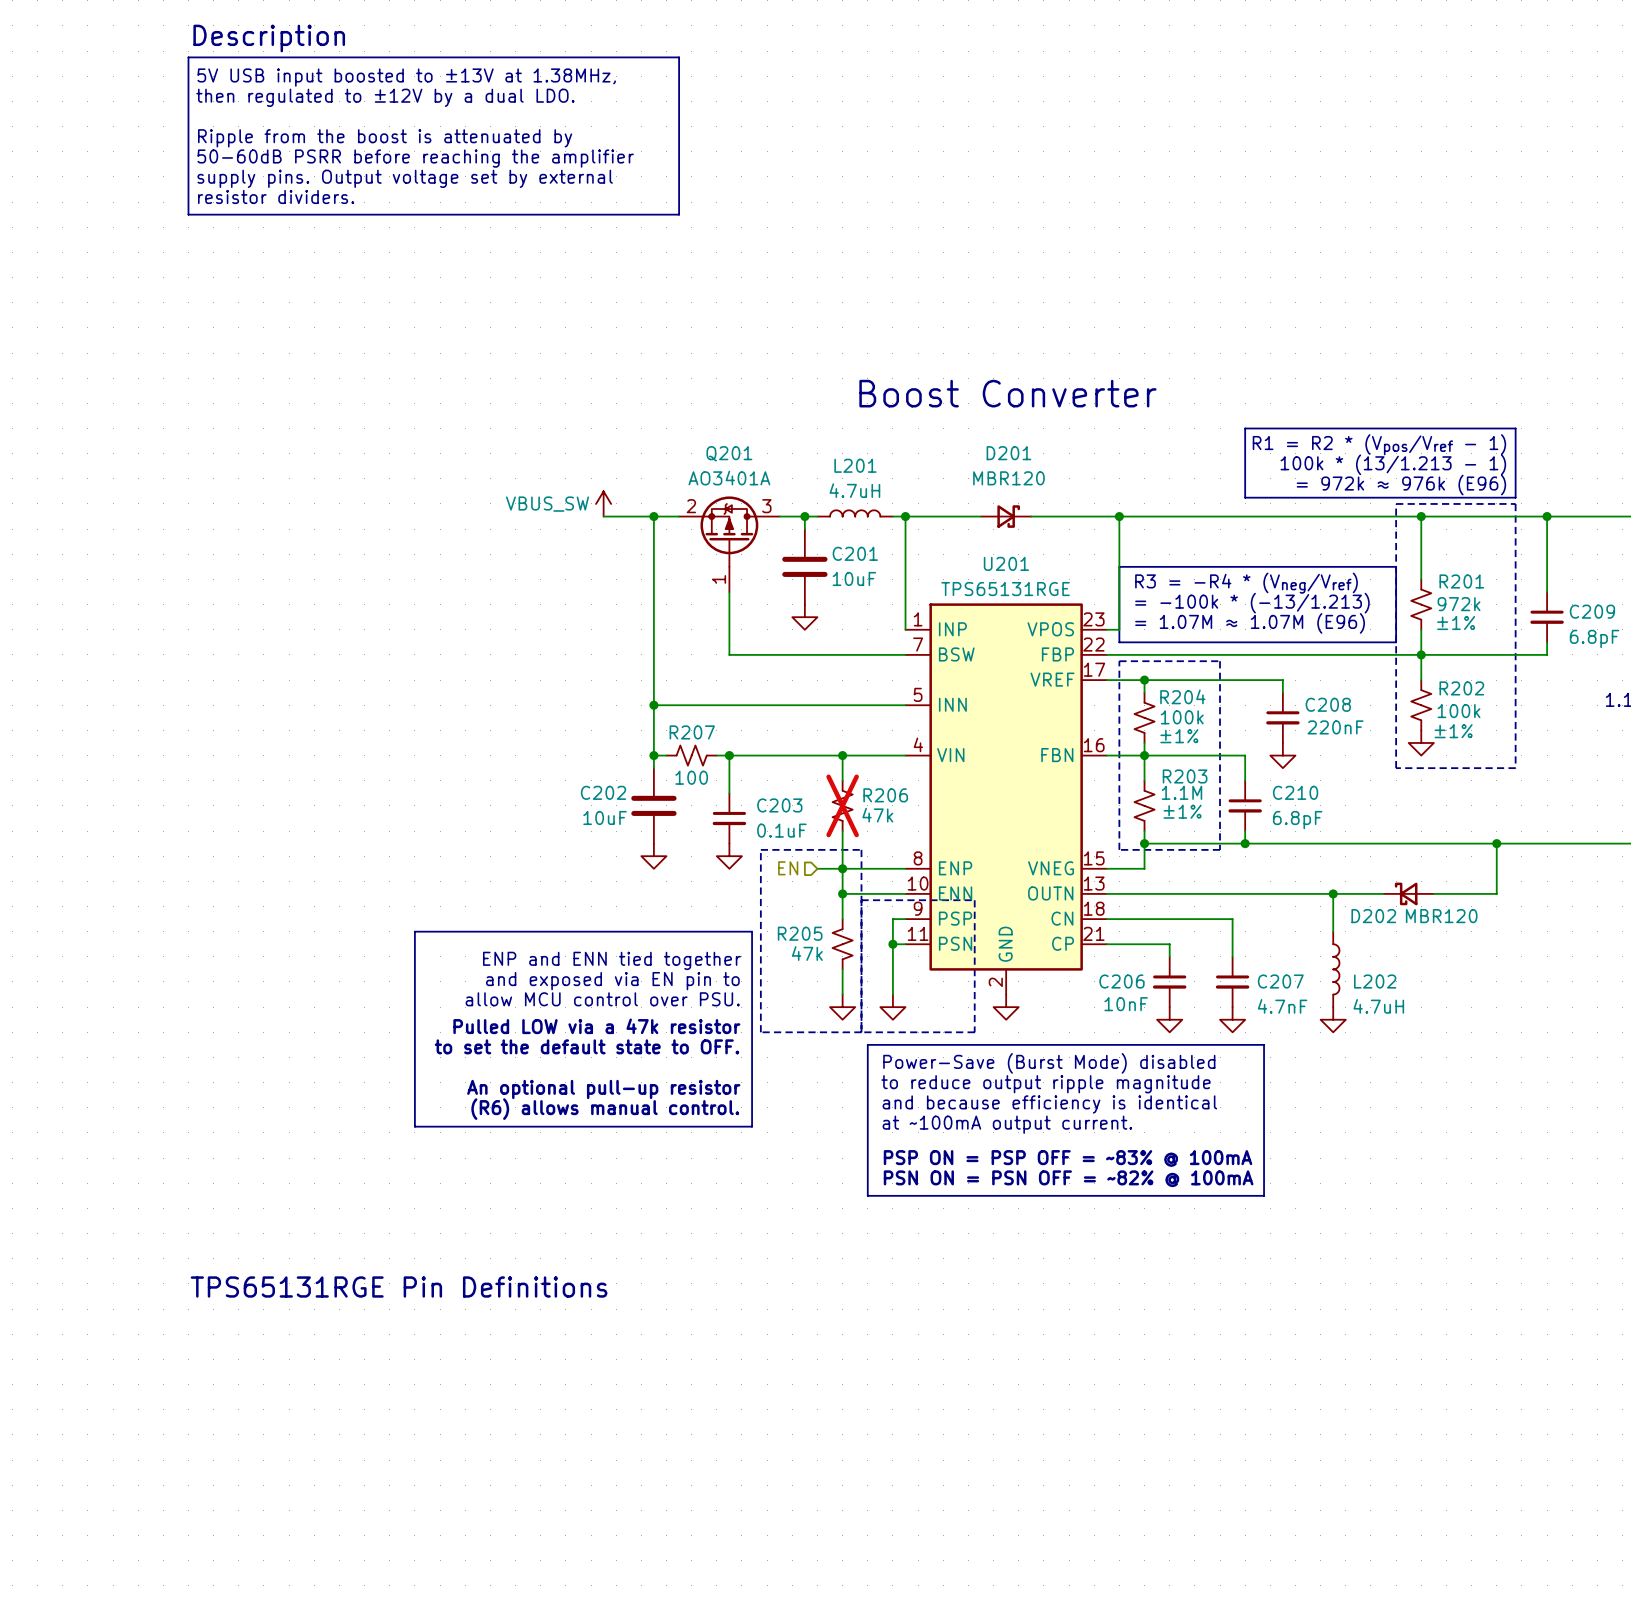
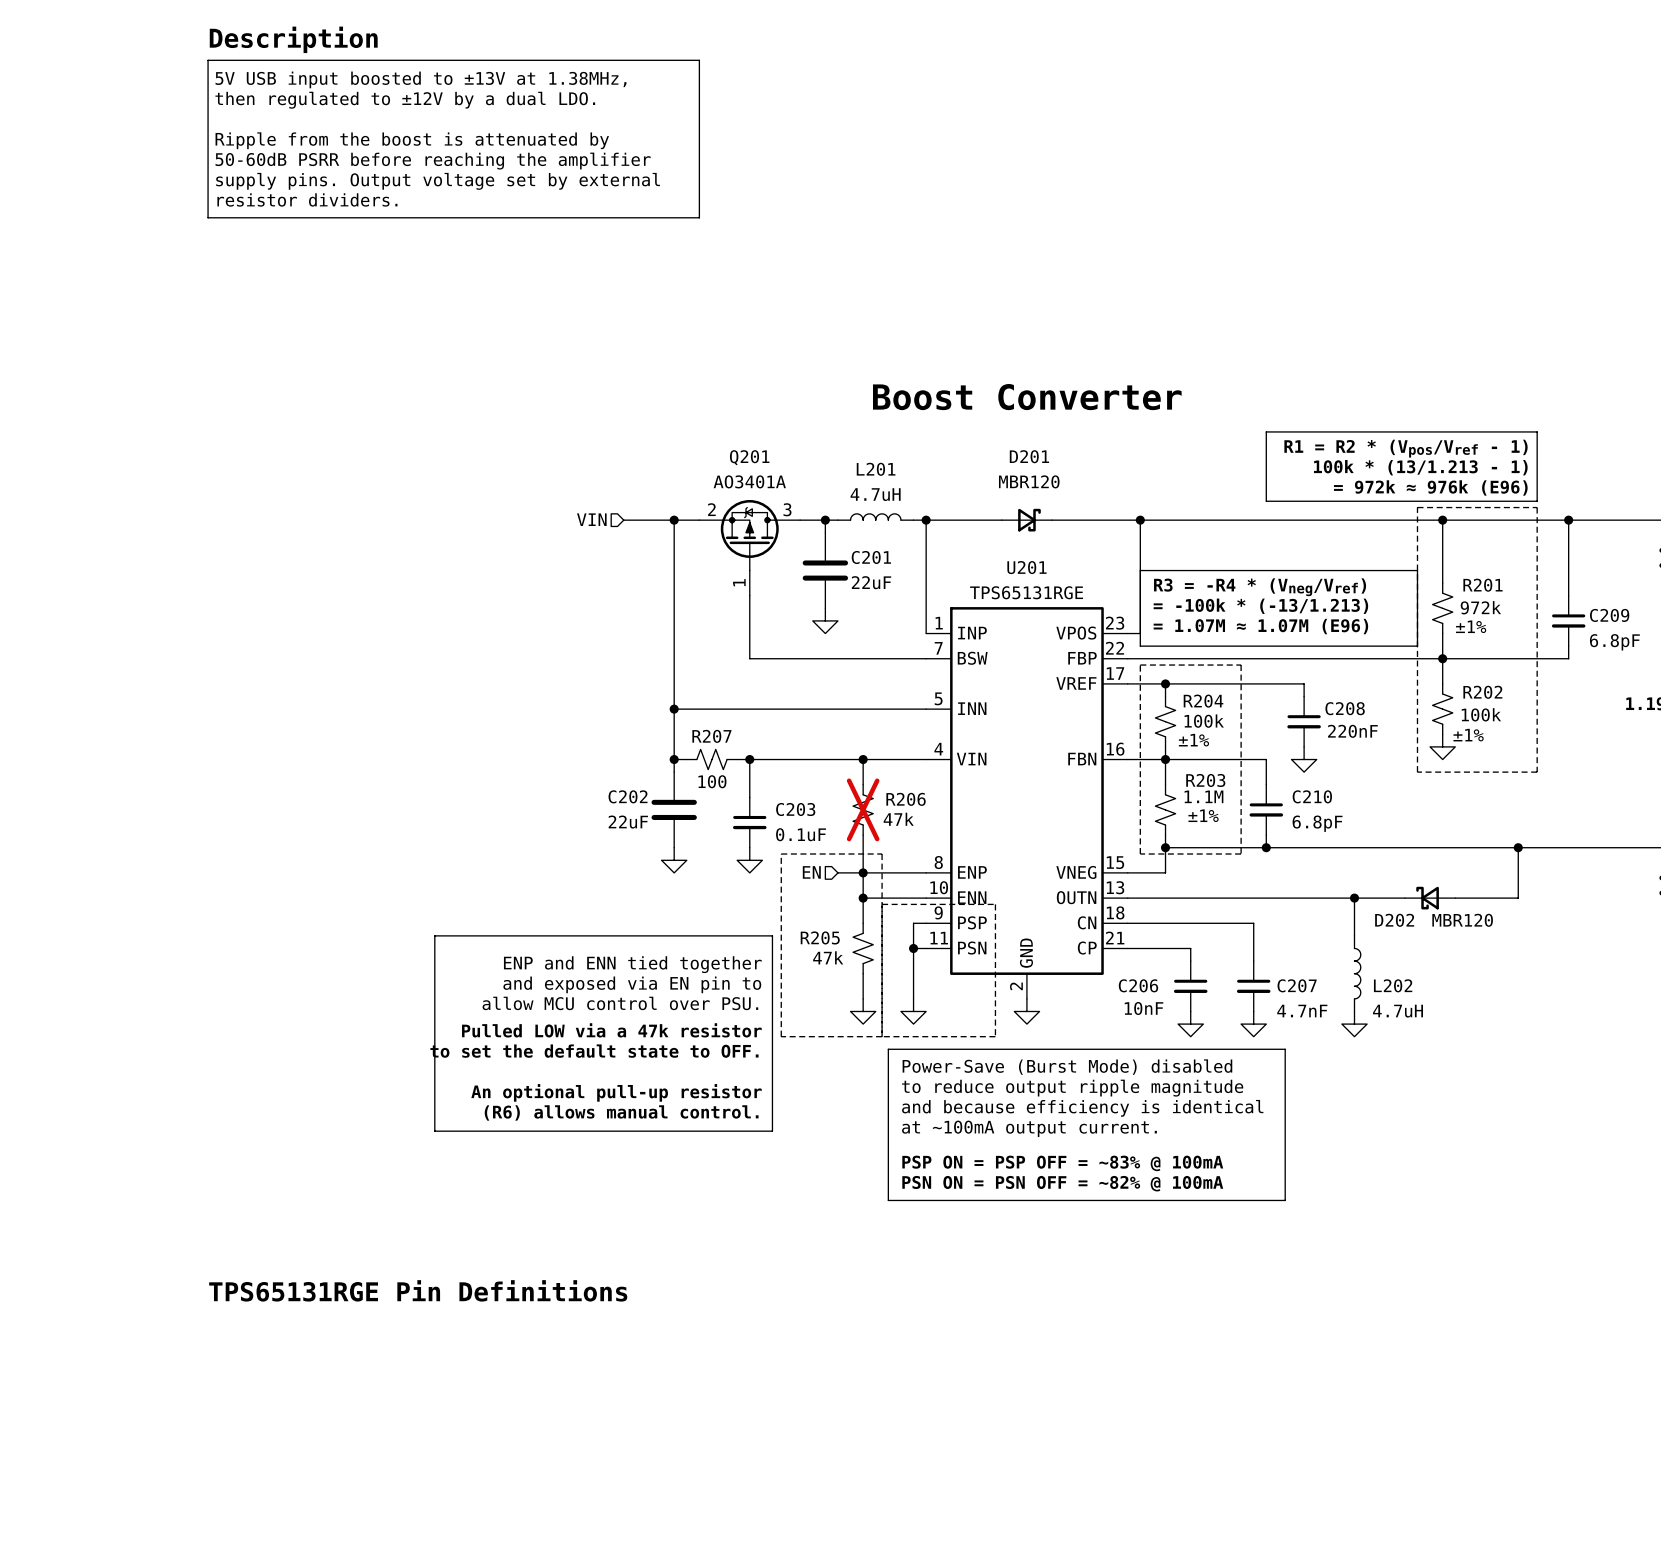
power symbol: VBUS_SW (603, 503) -> none
hierarchical label: none -> VIN (591, 519)
C201 value: 10uF (854, 578) -> 22uF (871, 582)
C202 value: 10uF (605, 817) -> 22uF (628, 822)

